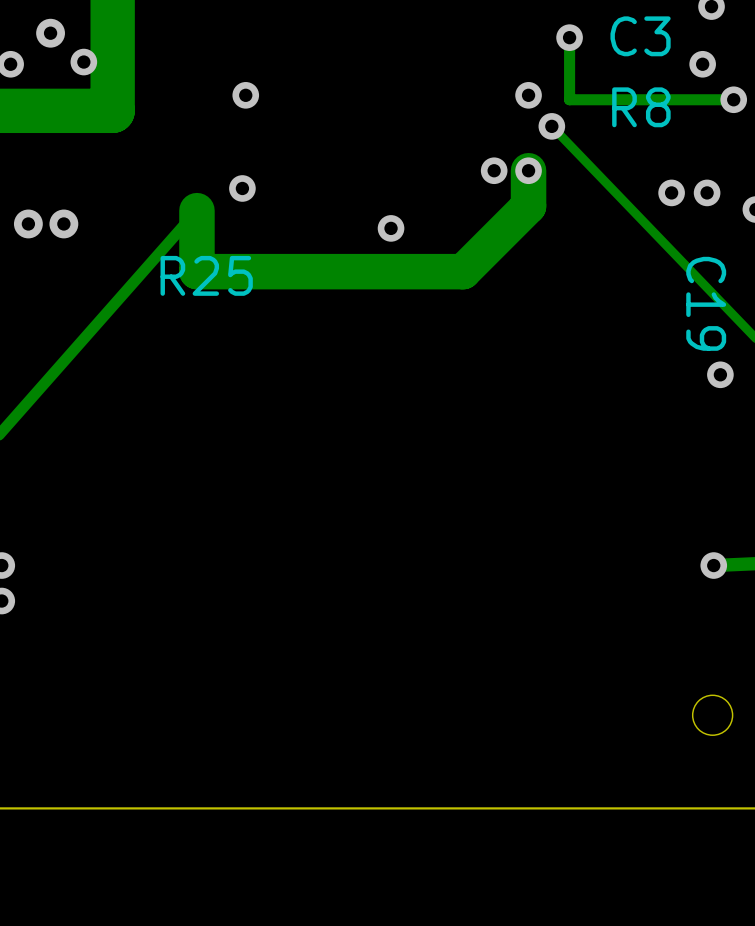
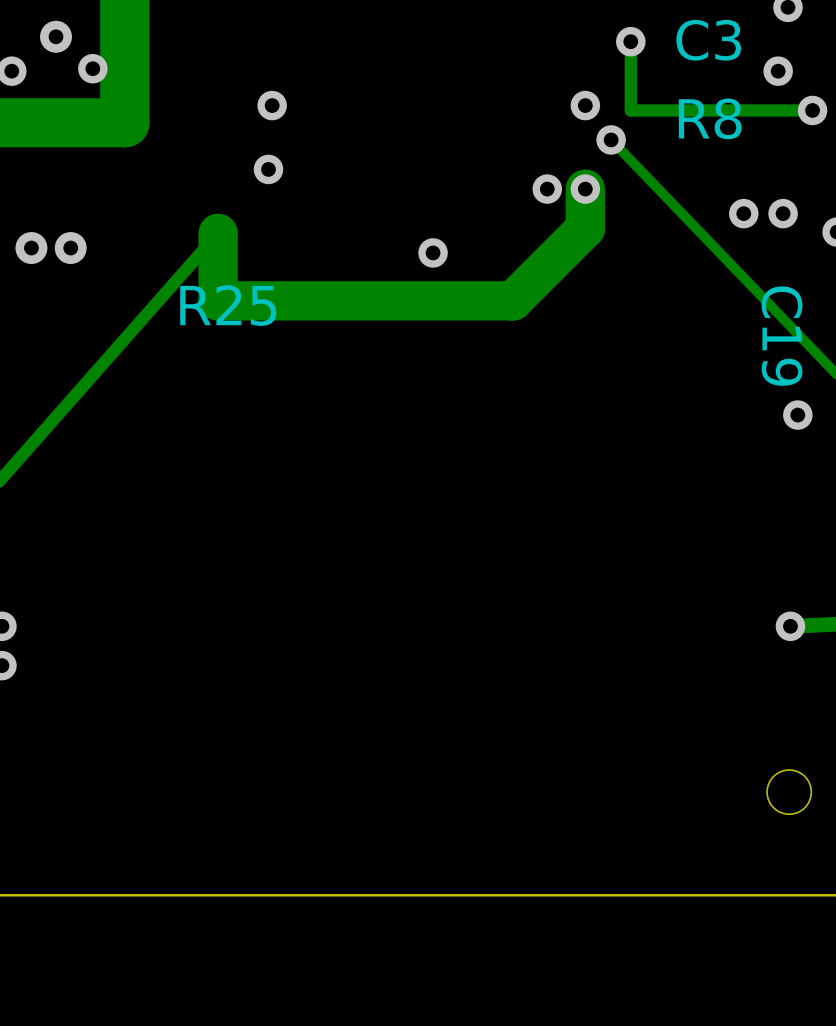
via position: (242, 188) -> (268, 169)

